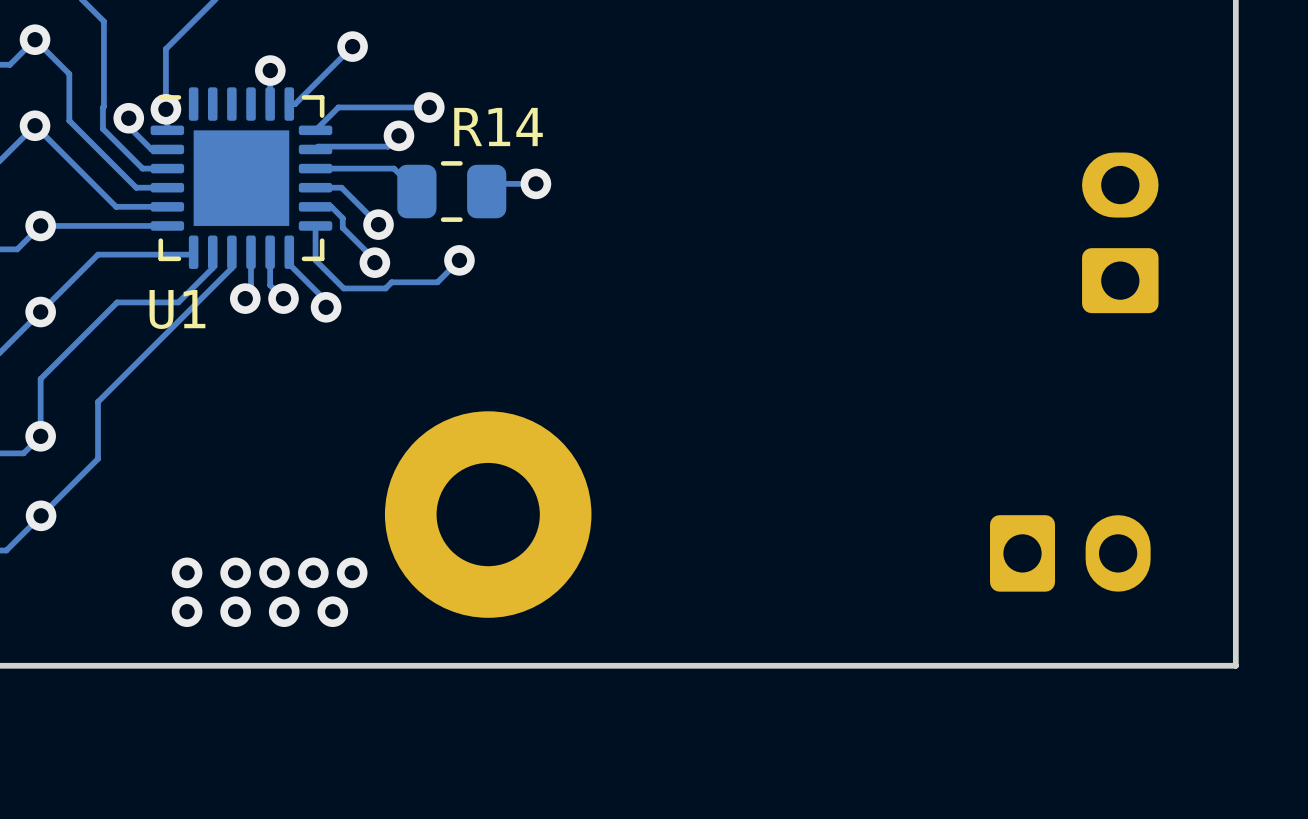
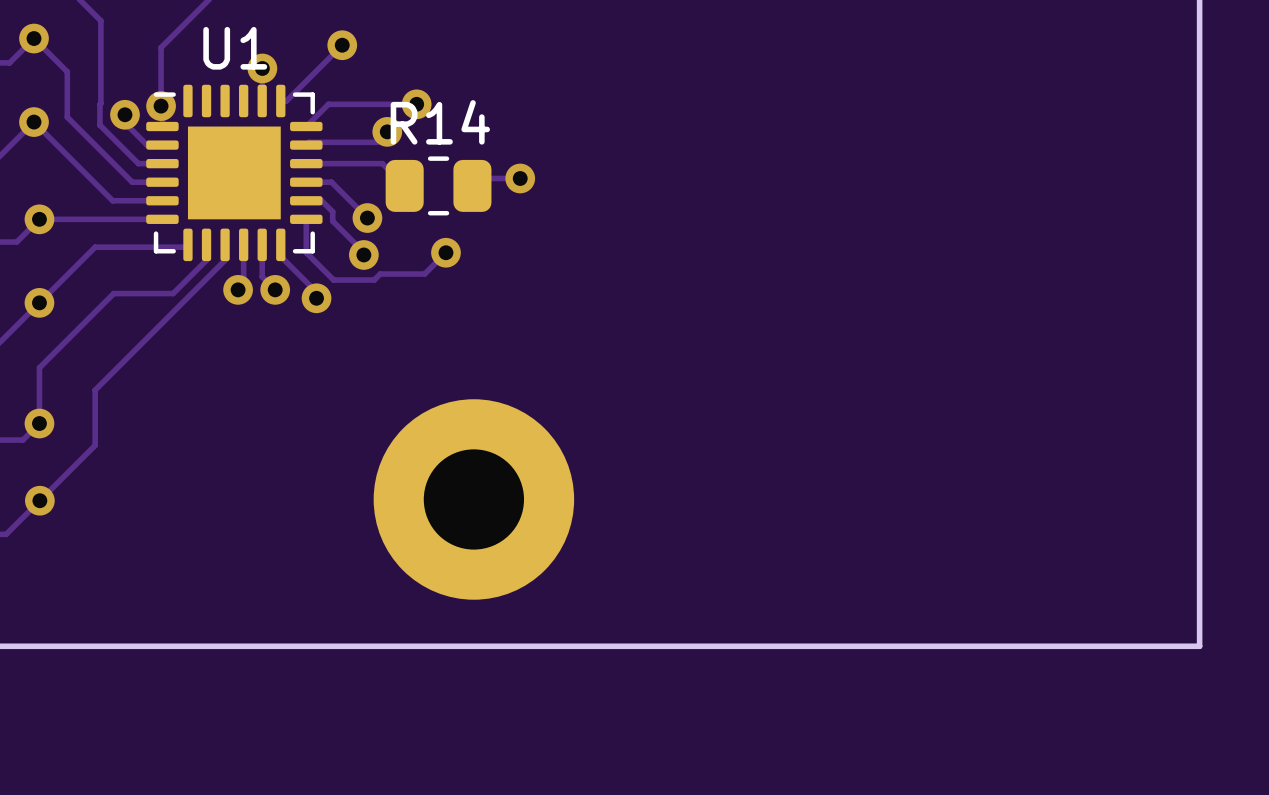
R14 name position: R14 (498, 127) -> R14 (440, 122)
part: (1120, 232) -> none
U1 name position: U1 (177, 309) -> U1 (235, 48)
part: (1070, 553) -> none
via: (187, 572) -> none
via: (235, 572) -> none
via: (274, 572) -> none
via: (313, 572) -> none
via: (352, 572) -> none
via: (187, 611) -> none
via: (235, 611) -> none
via: (284, 611) -> none
via: (332, 611) -> none

